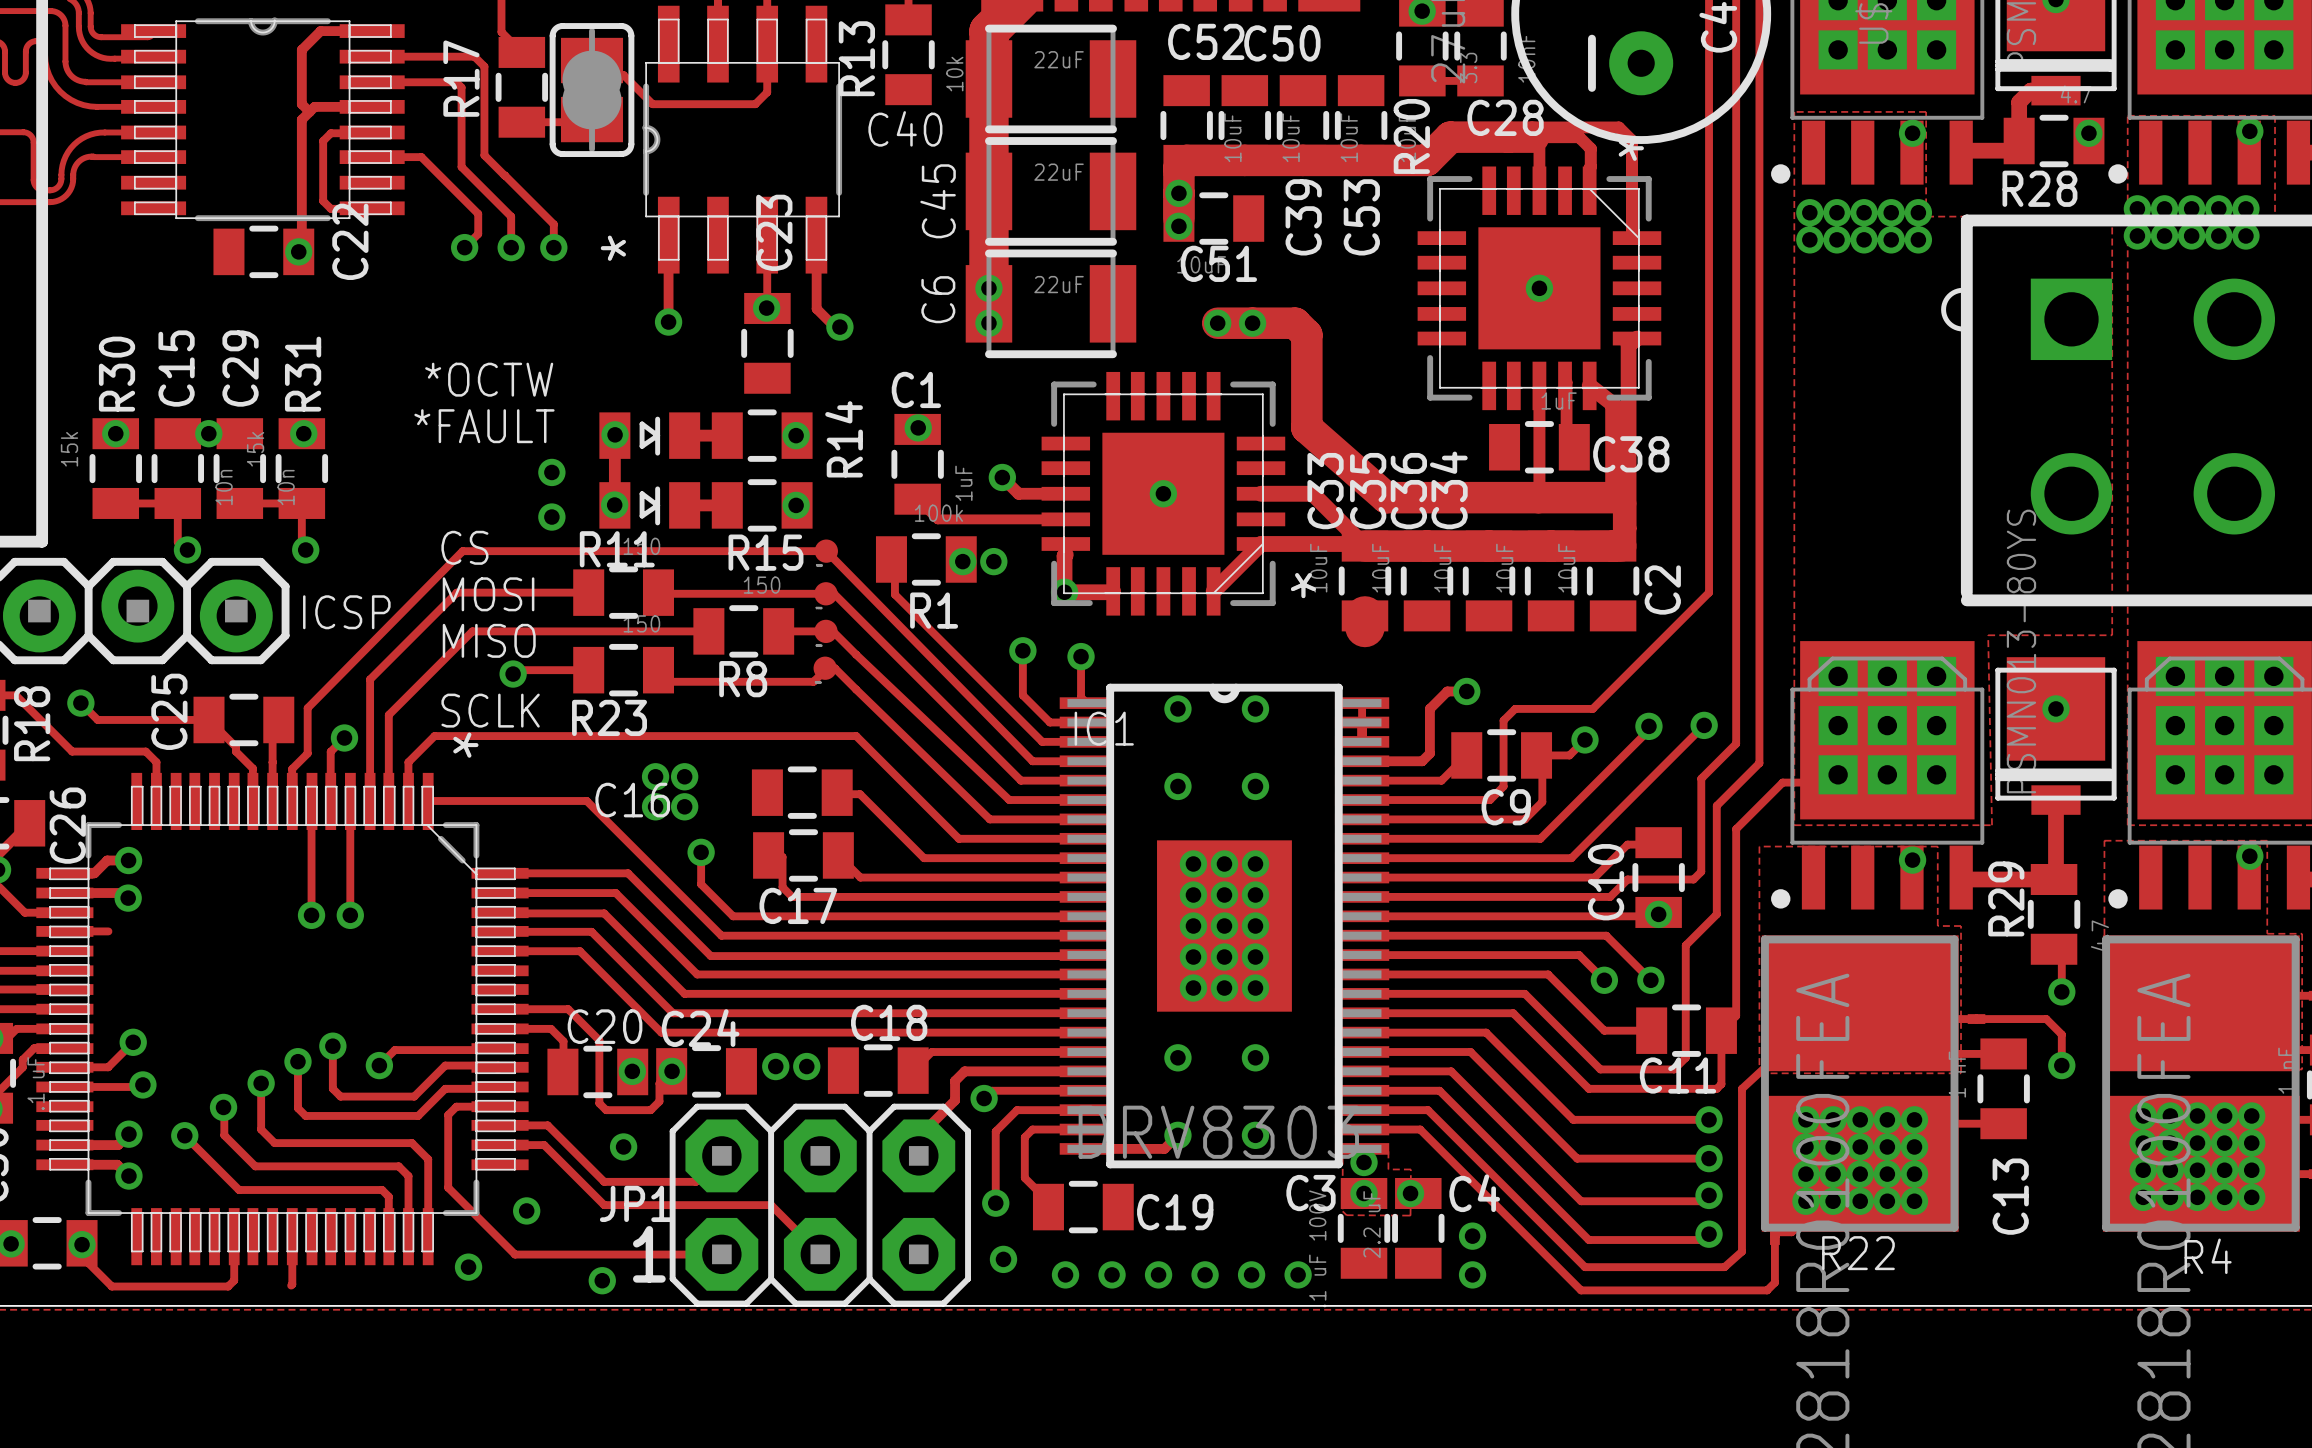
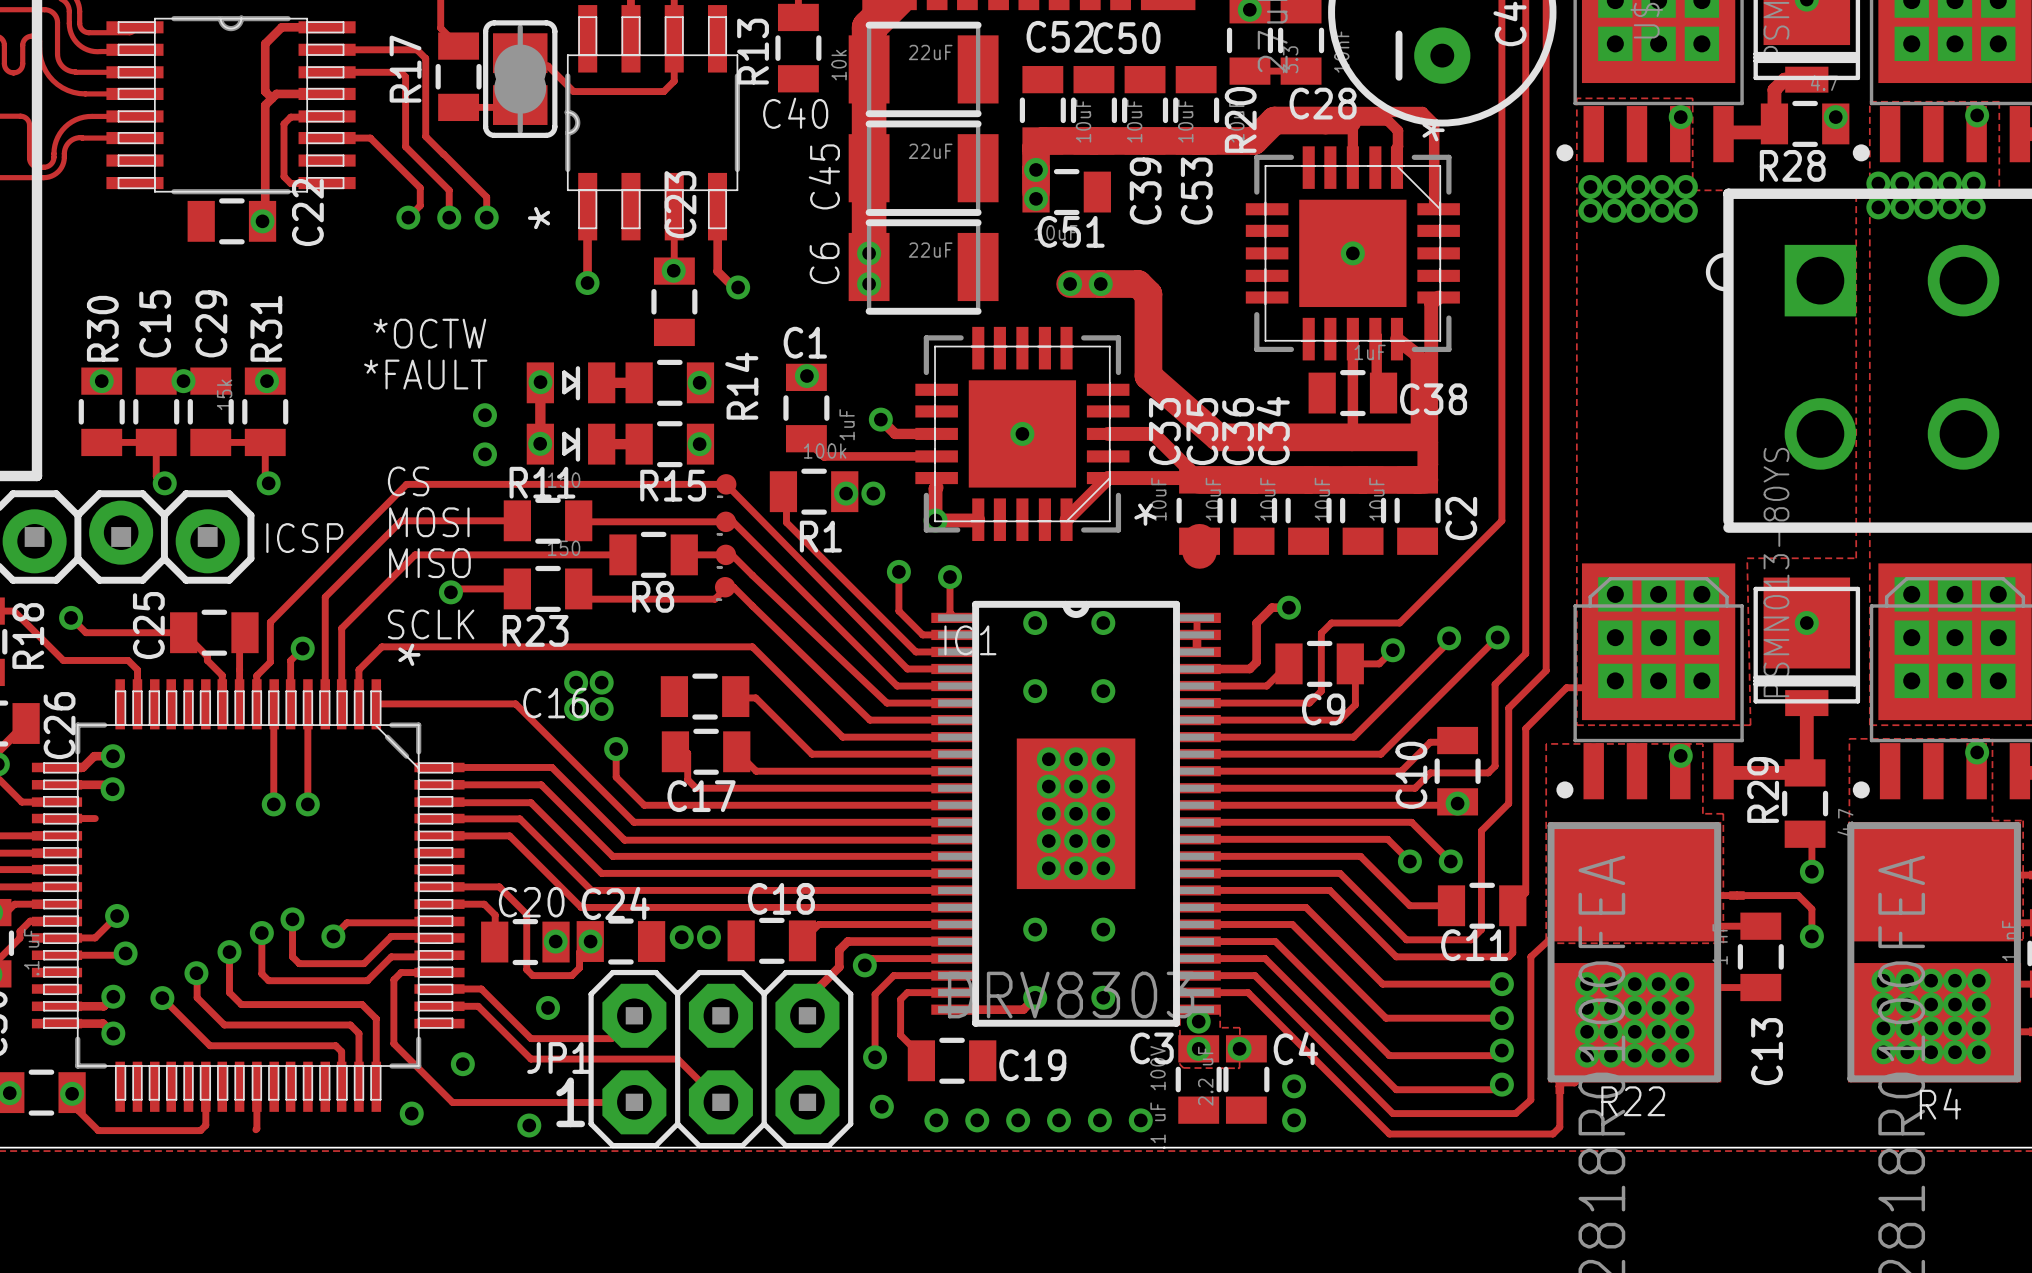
R30 value: 15k (69, 449) -> none
C15 value: 10n (224, 487) -> none
C29 value: 10n (286, 487) -> none
R8 value: 150 (762, 585) -> none

